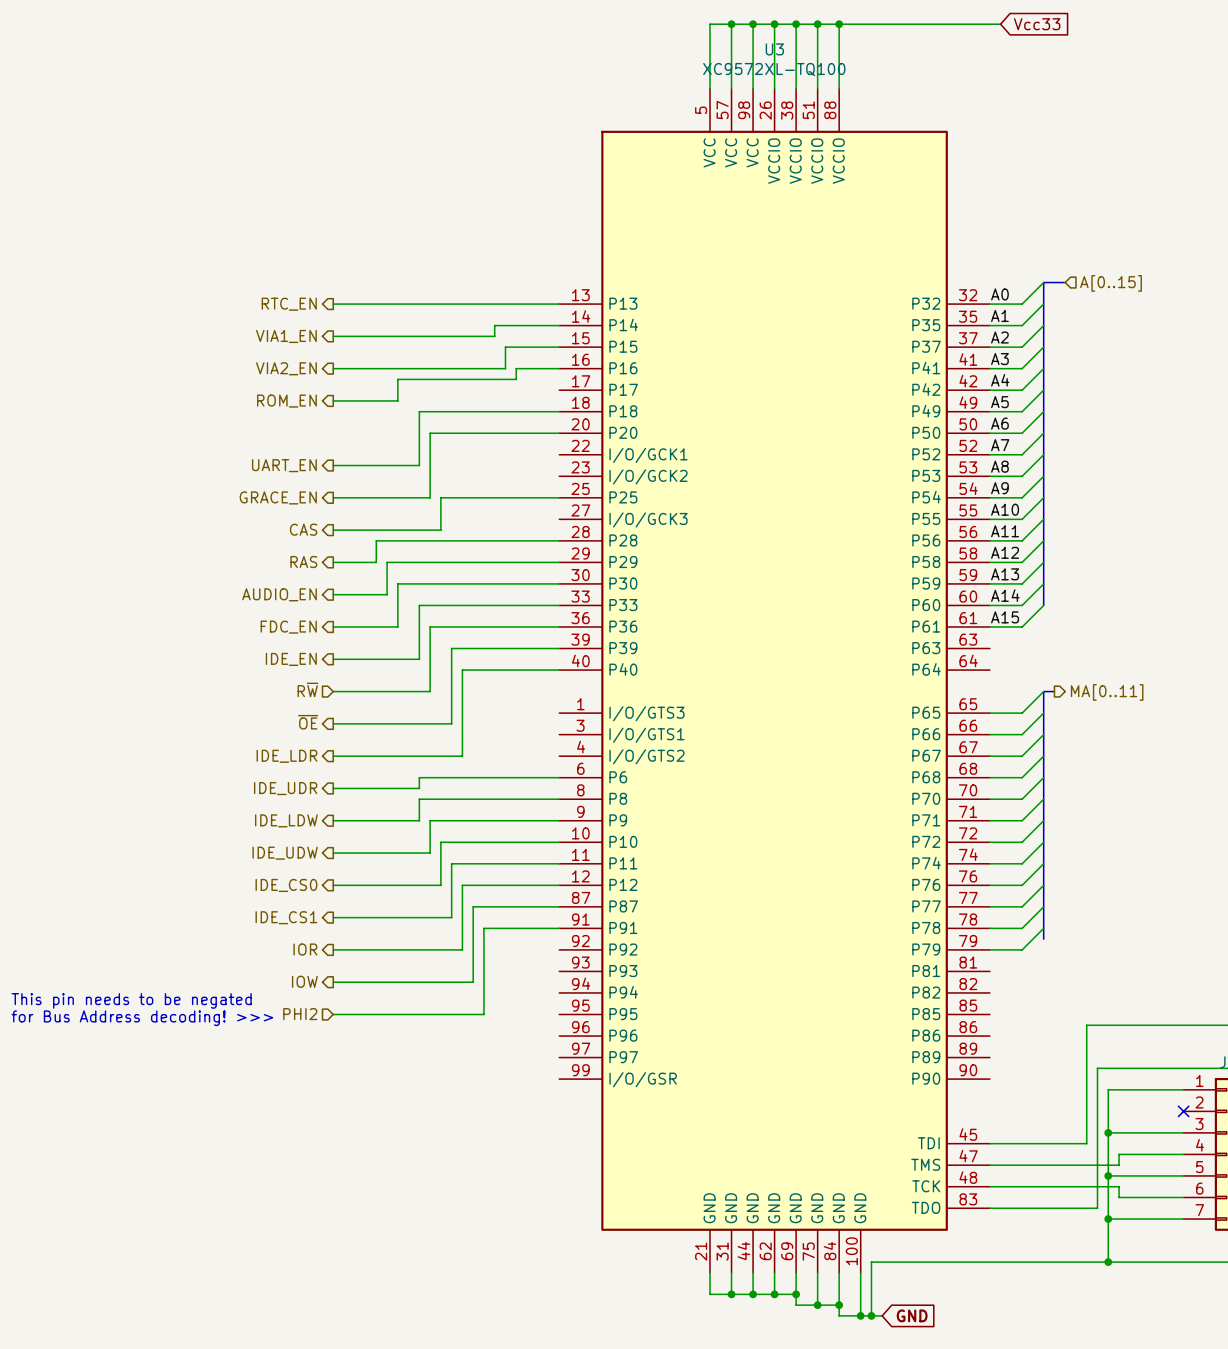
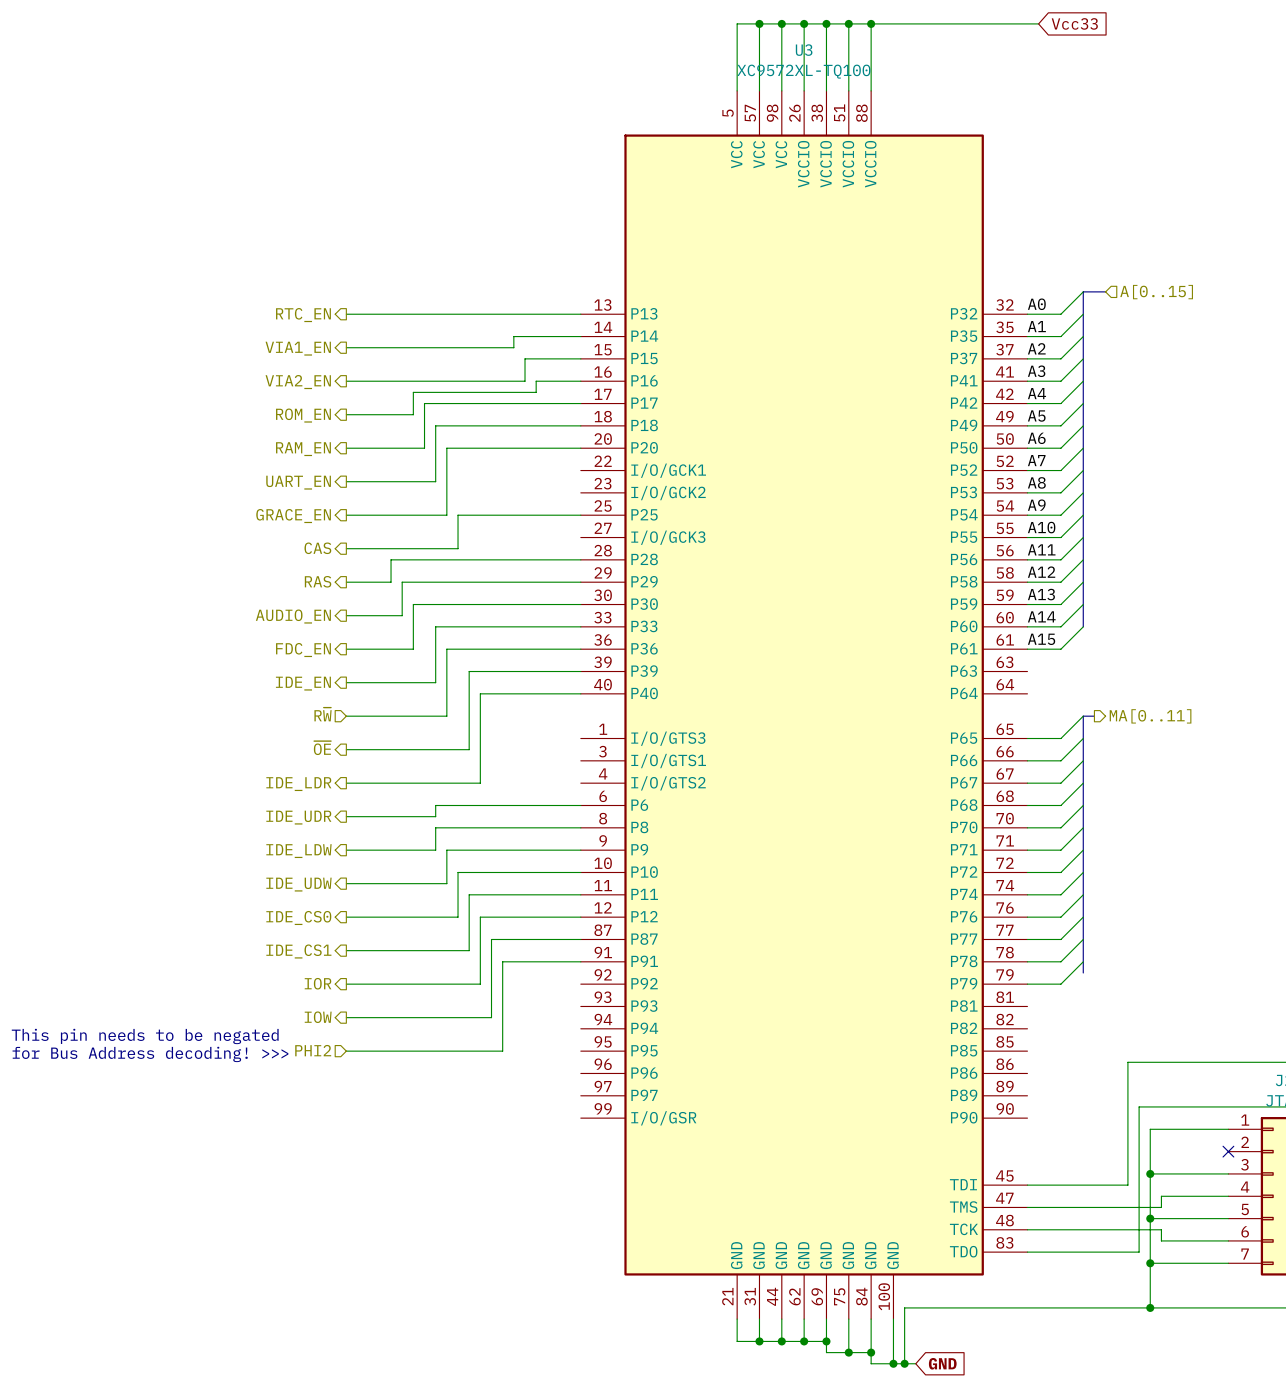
wire: none -> (580, 403) (424, 403) (424, 448) (346, 448)
hierarchical label: none -> RAM_EN (303, 449)

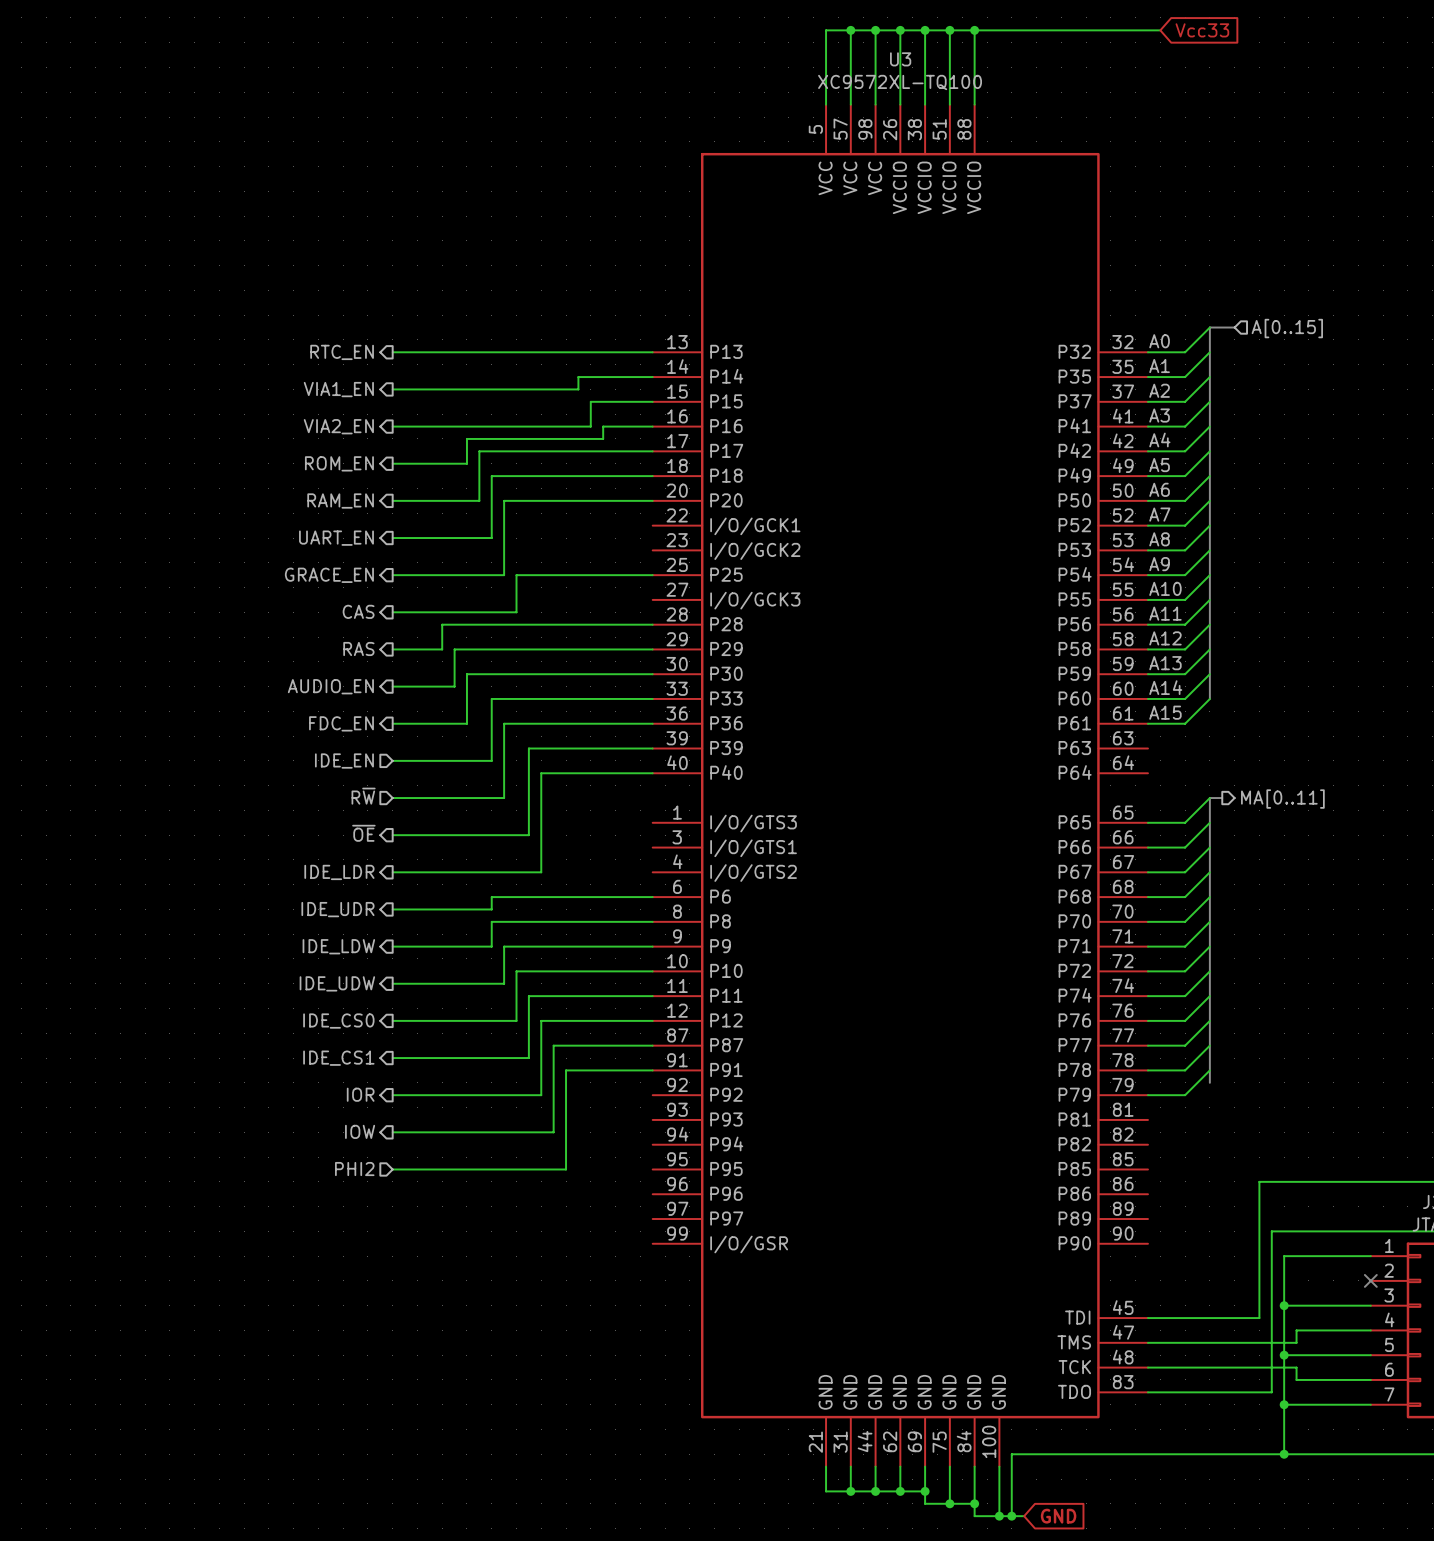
hierarchical label shape: output (303, 683) -> input (344, 761)
text: This pin needs to be negated (145, 1036) -> none
text: for Bus Address decoding! >>> (150, 1054) -> none

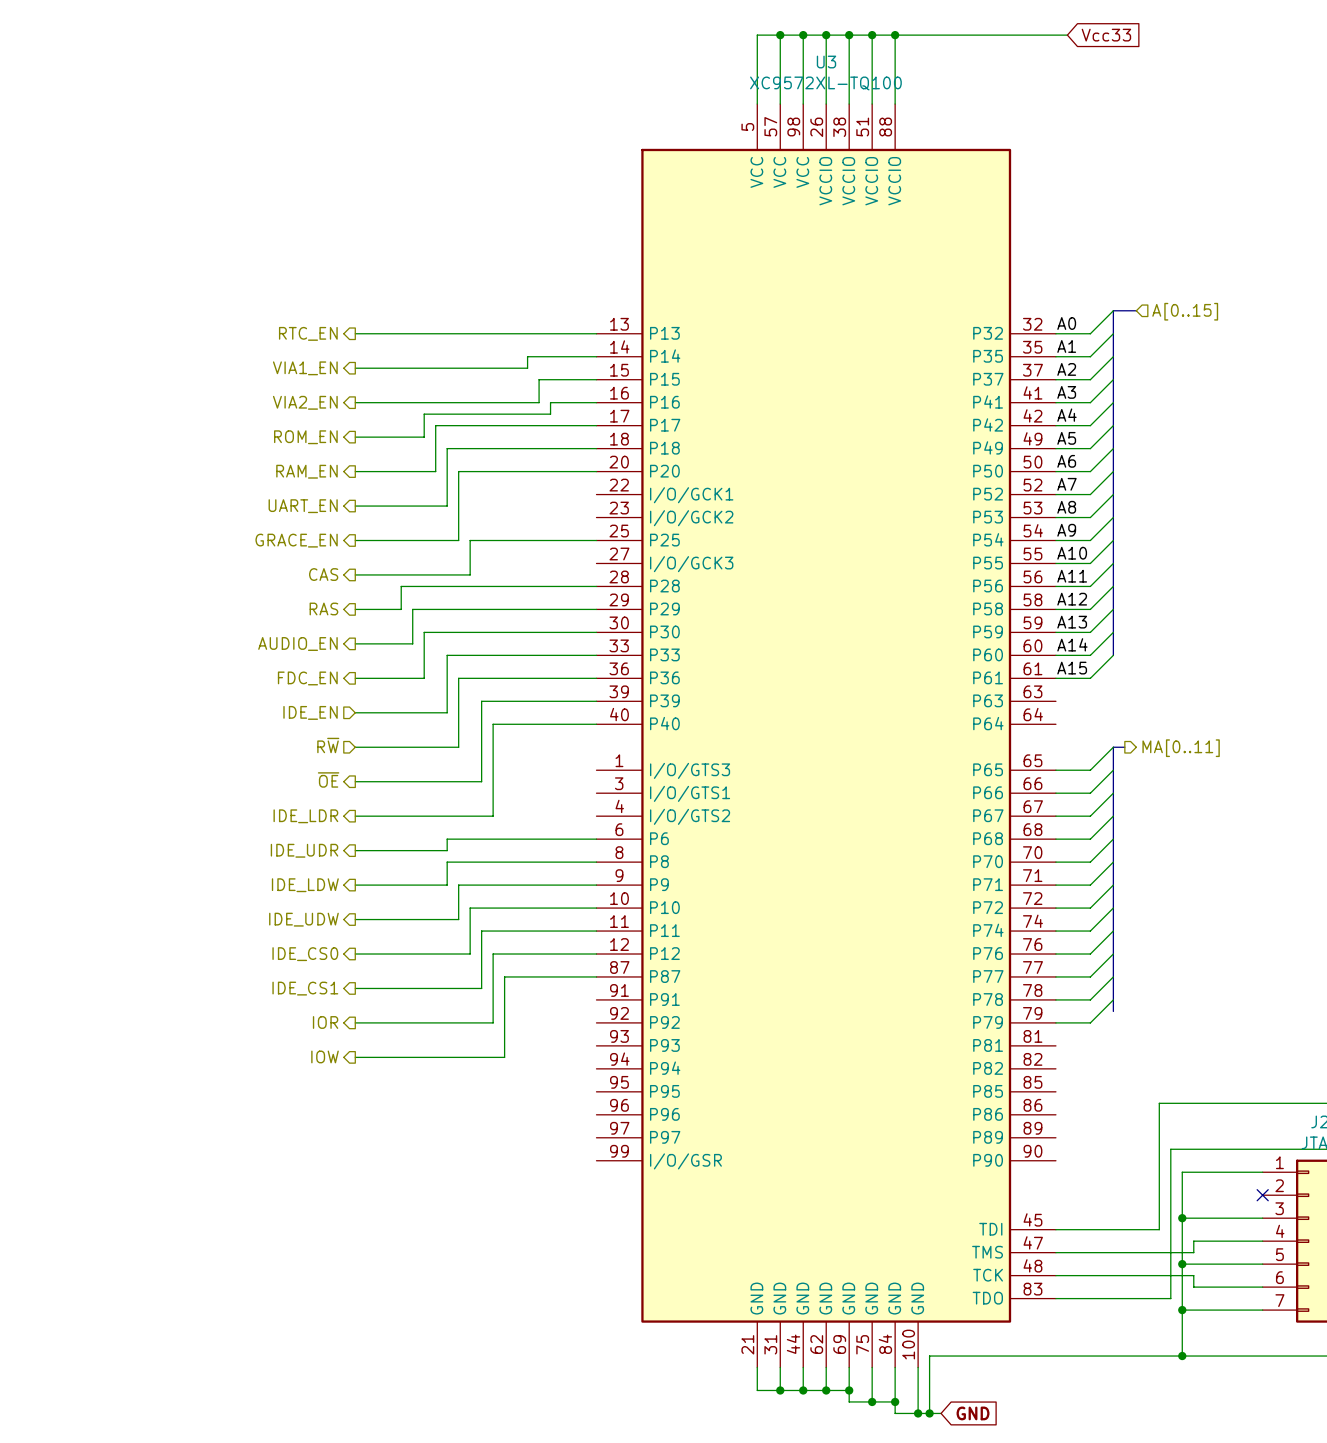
wire: (652, 1070) (566, 1070) (566, 1169) (392, 1169) -> none
hierarchical label: PHI2 (354, 1169) -> none

